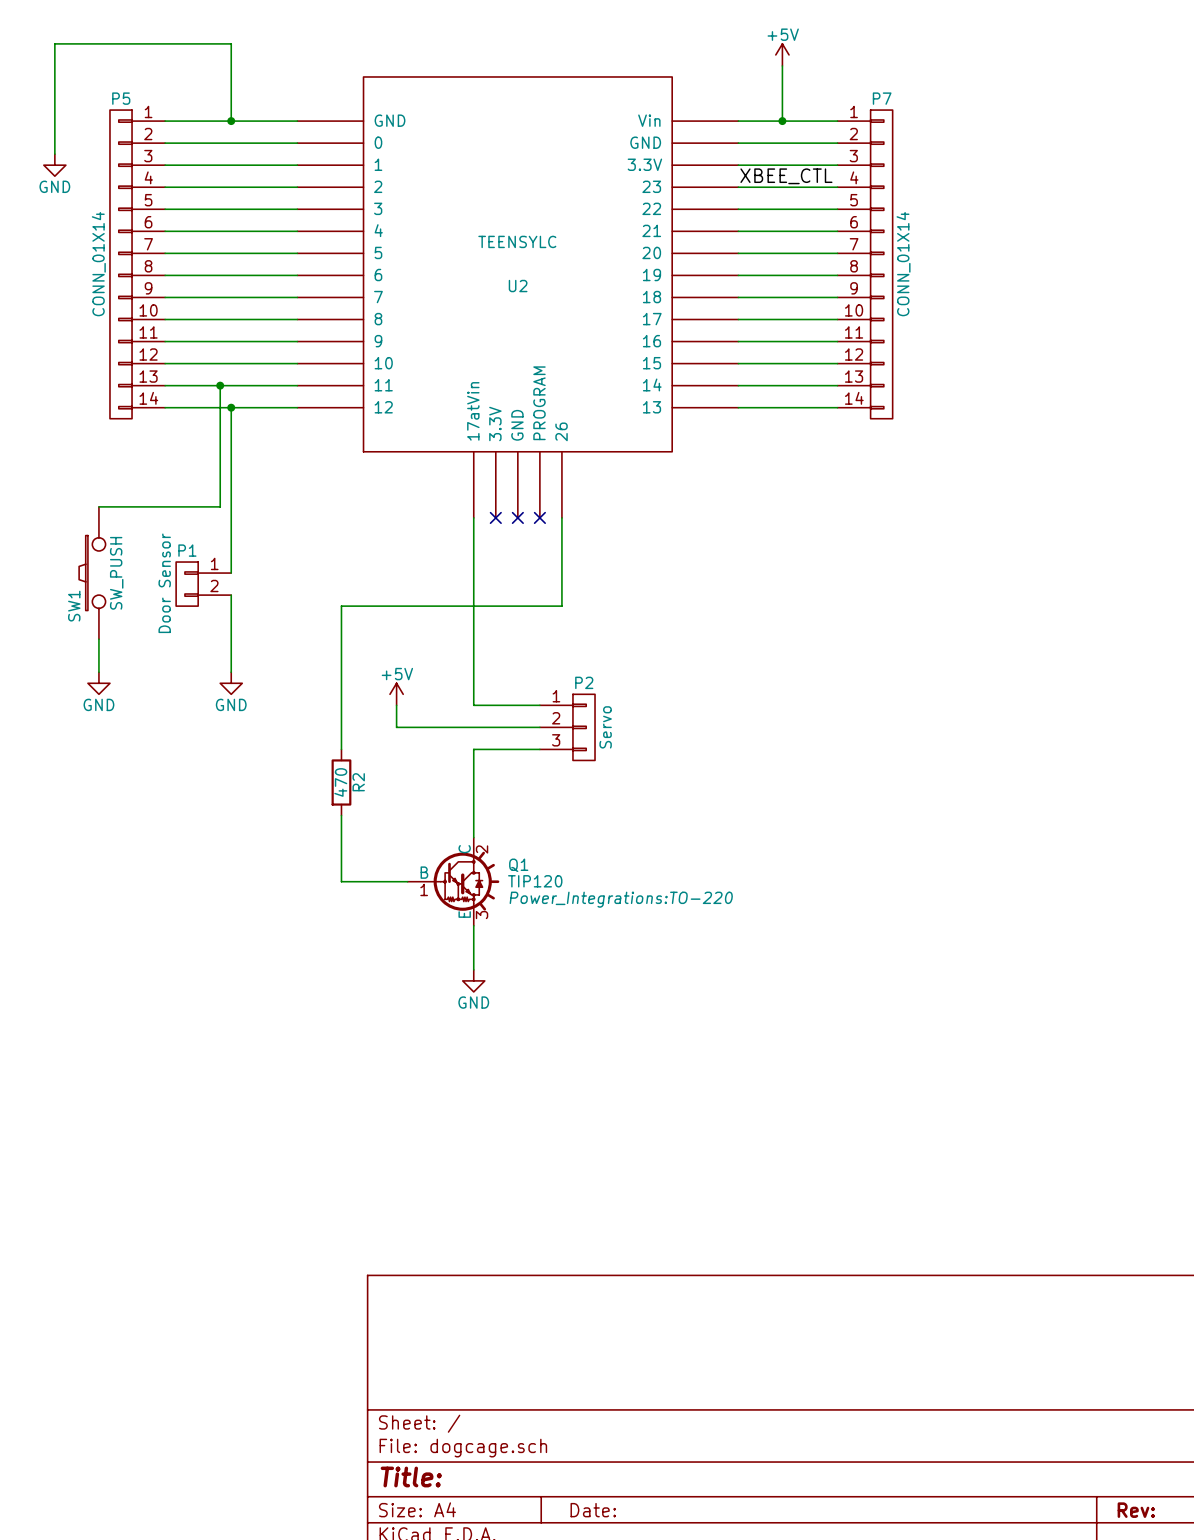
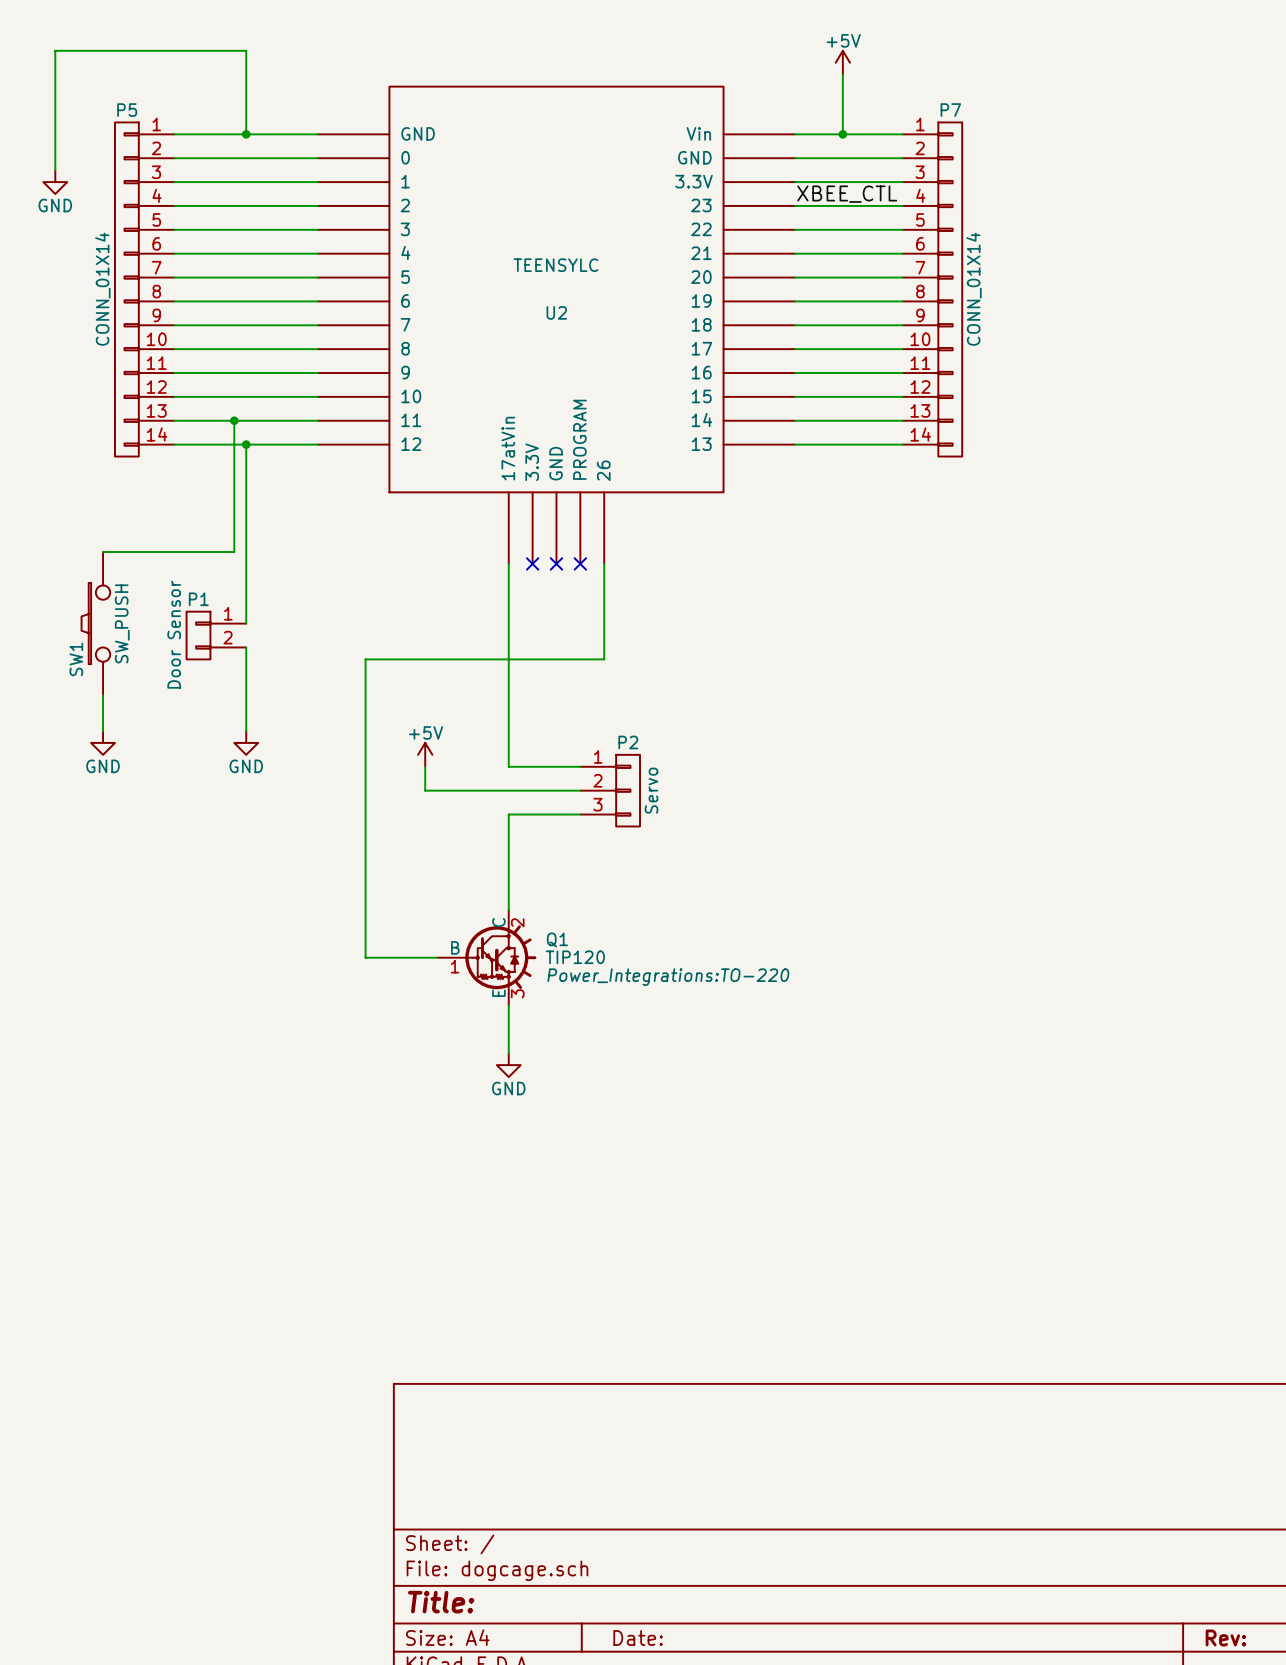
wire: none -> (365, 814) (365, 886)
R2: 470 (341, 782) -> none

